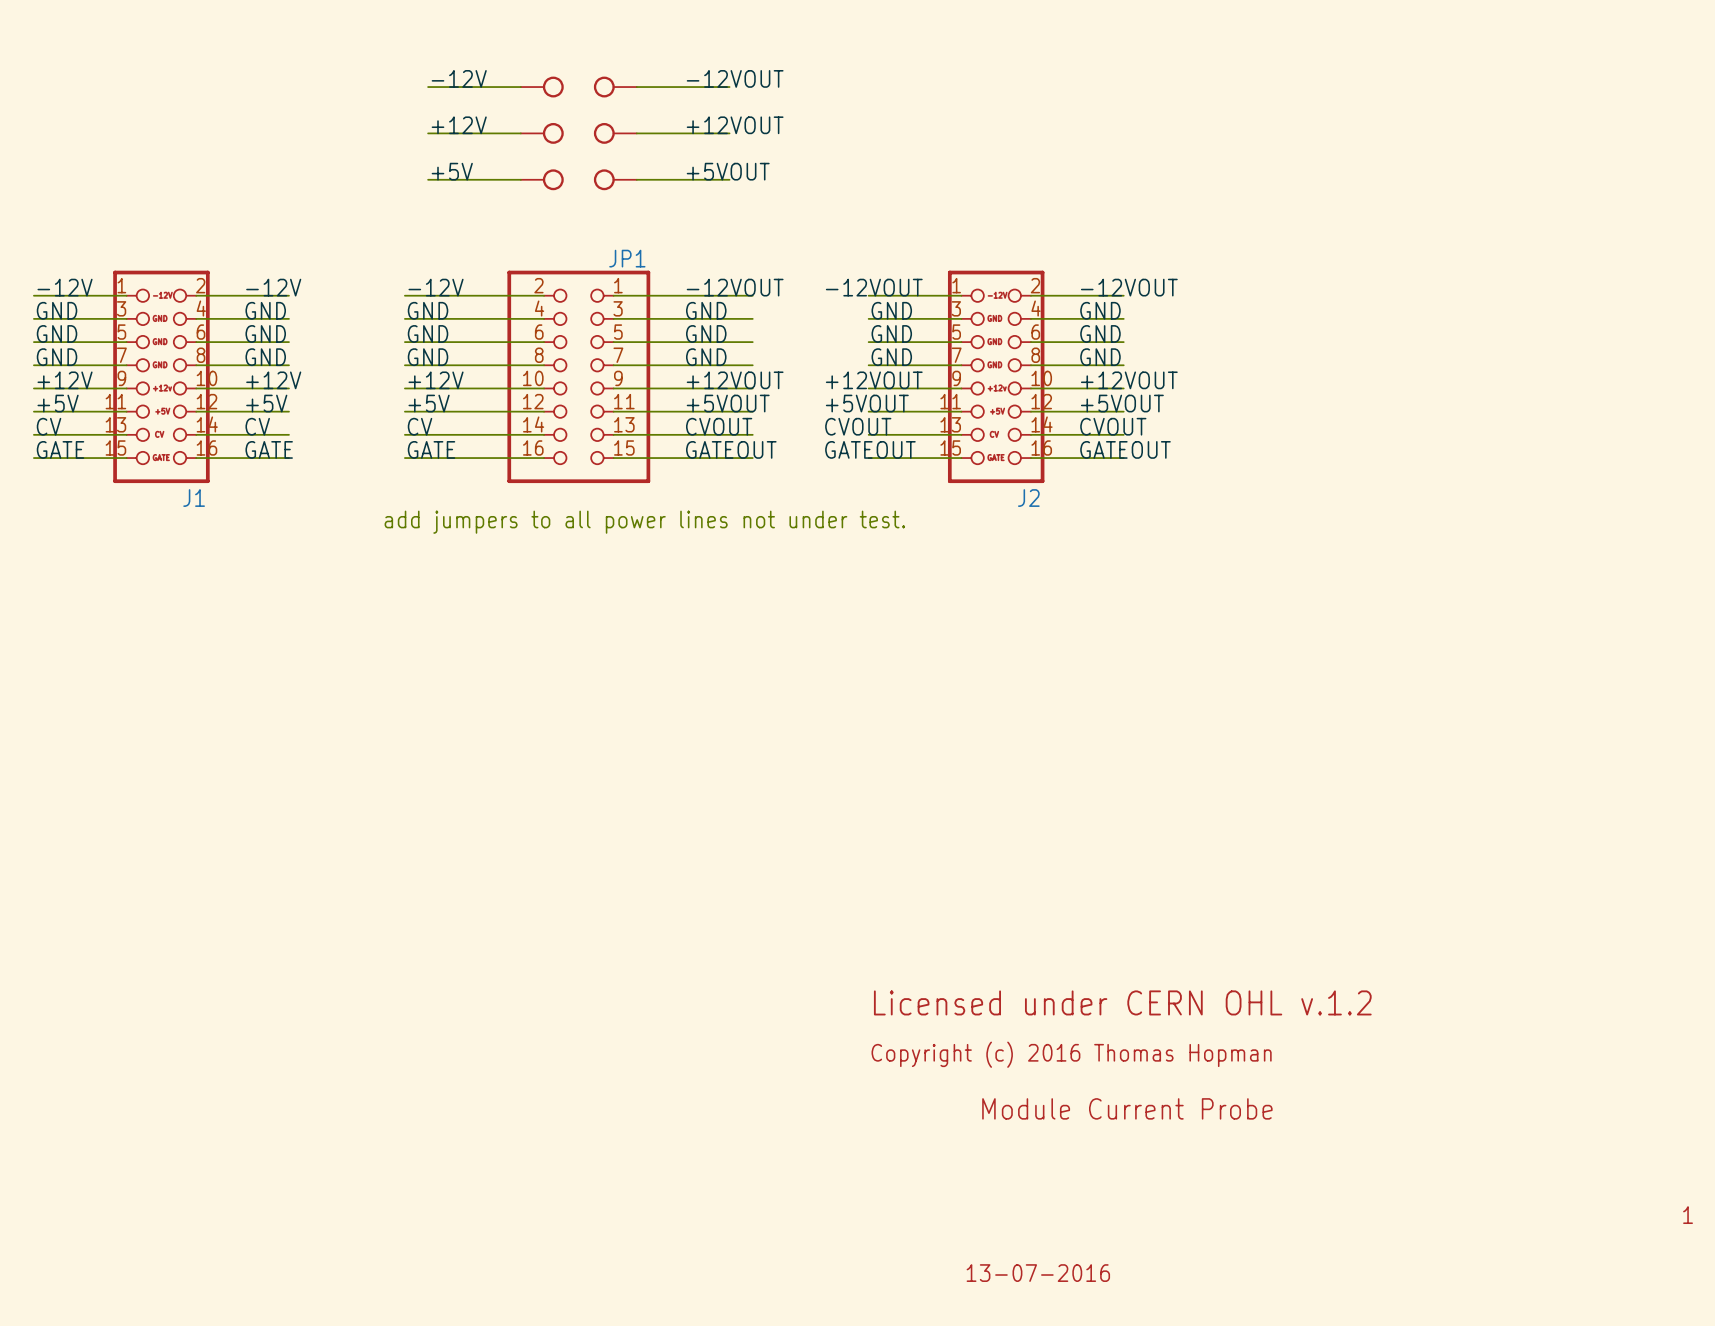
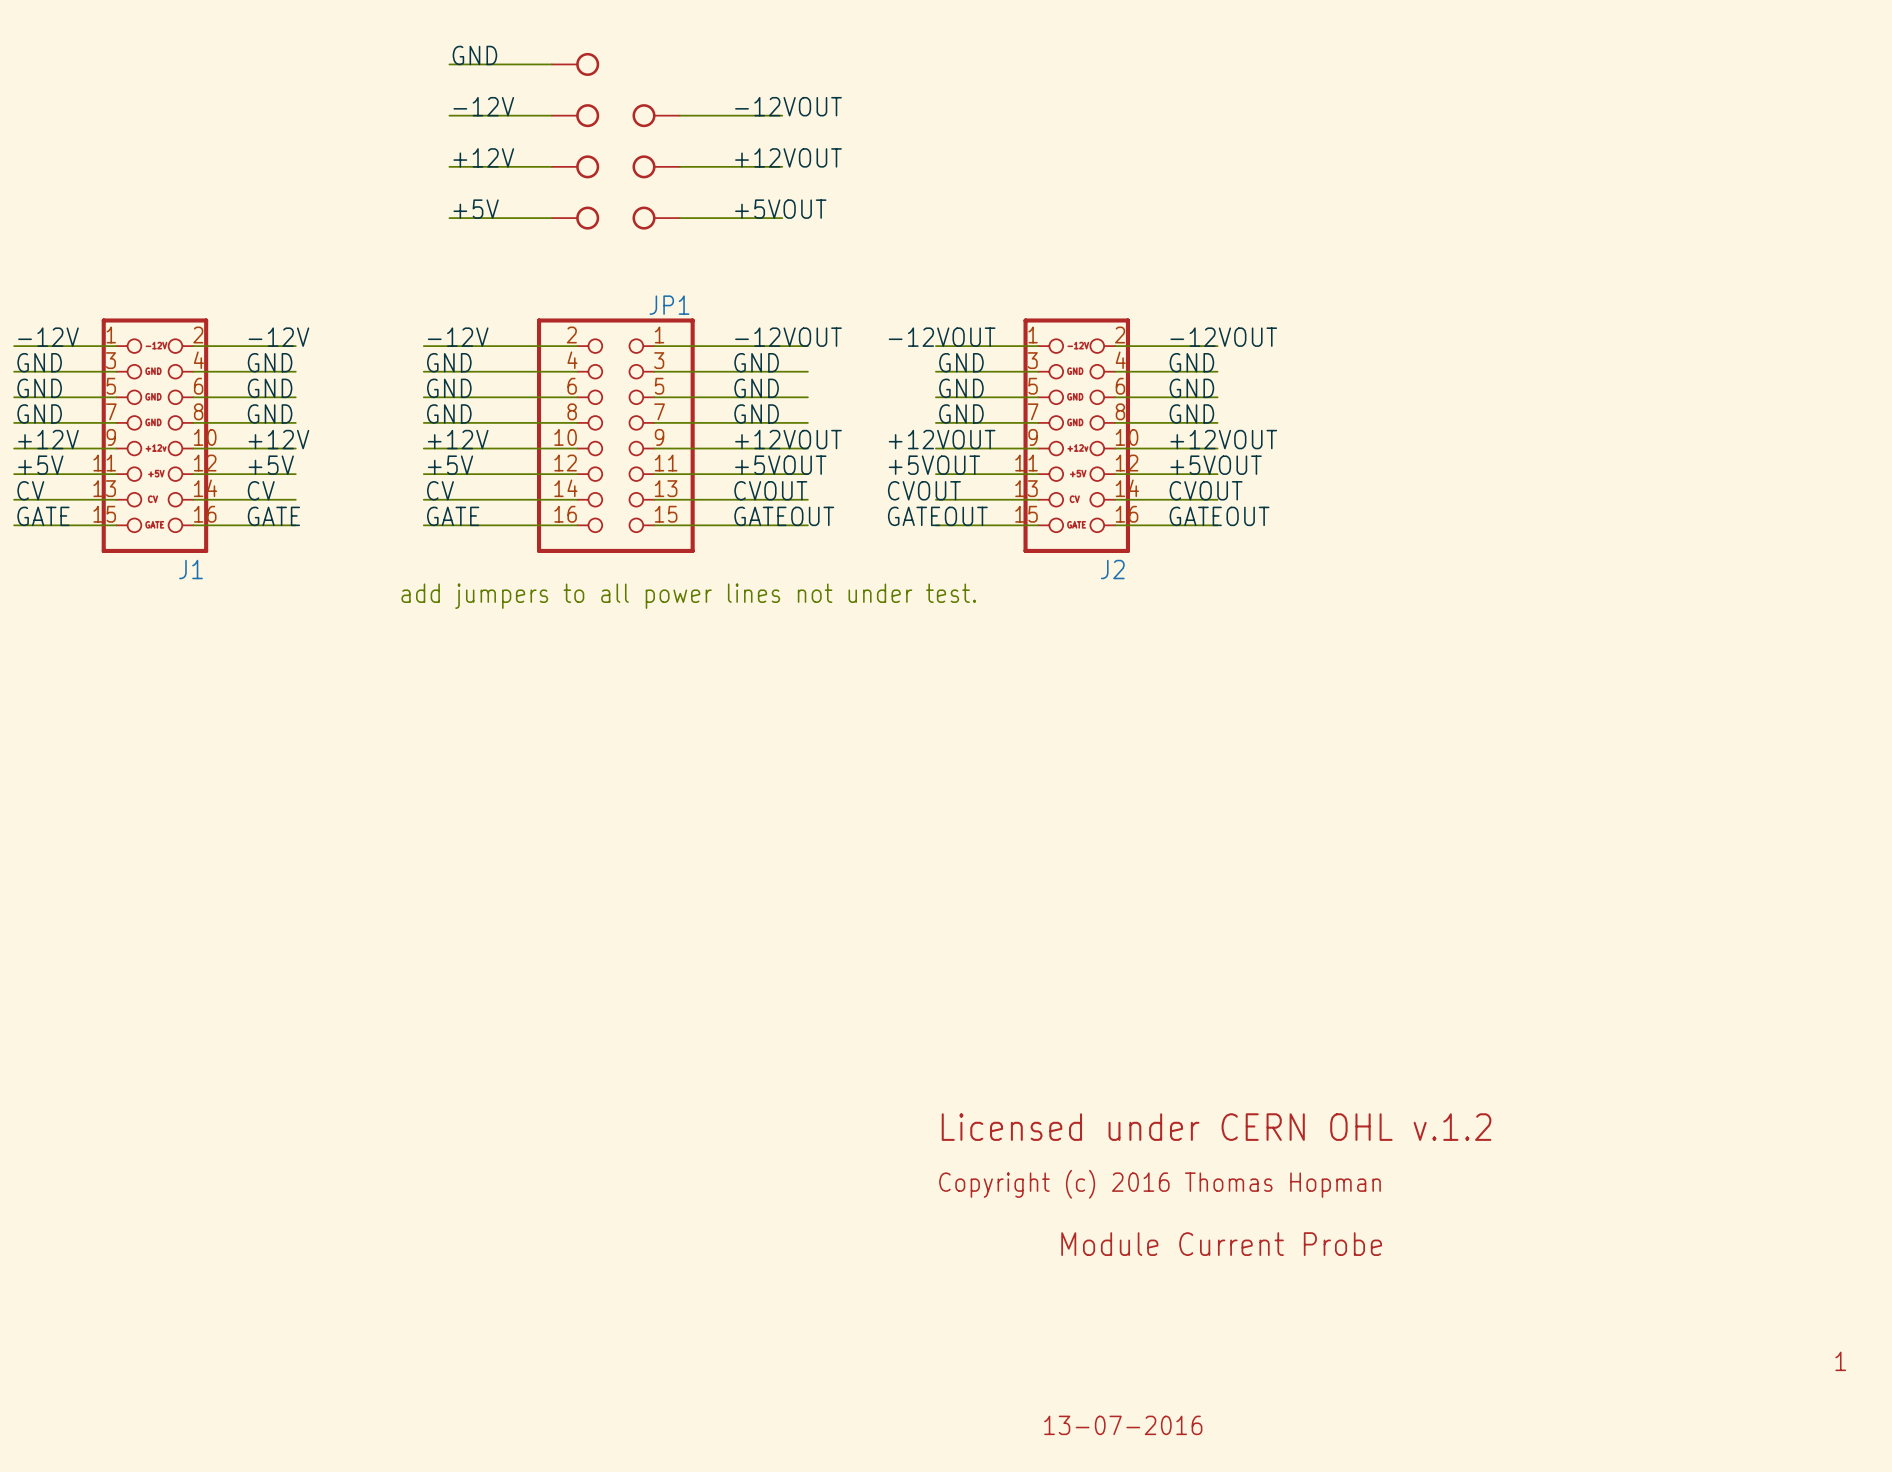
label: none -> GND (474, 55)
wire: none -> (449, 64) (551, 64)
part: none -> (575, 64)

